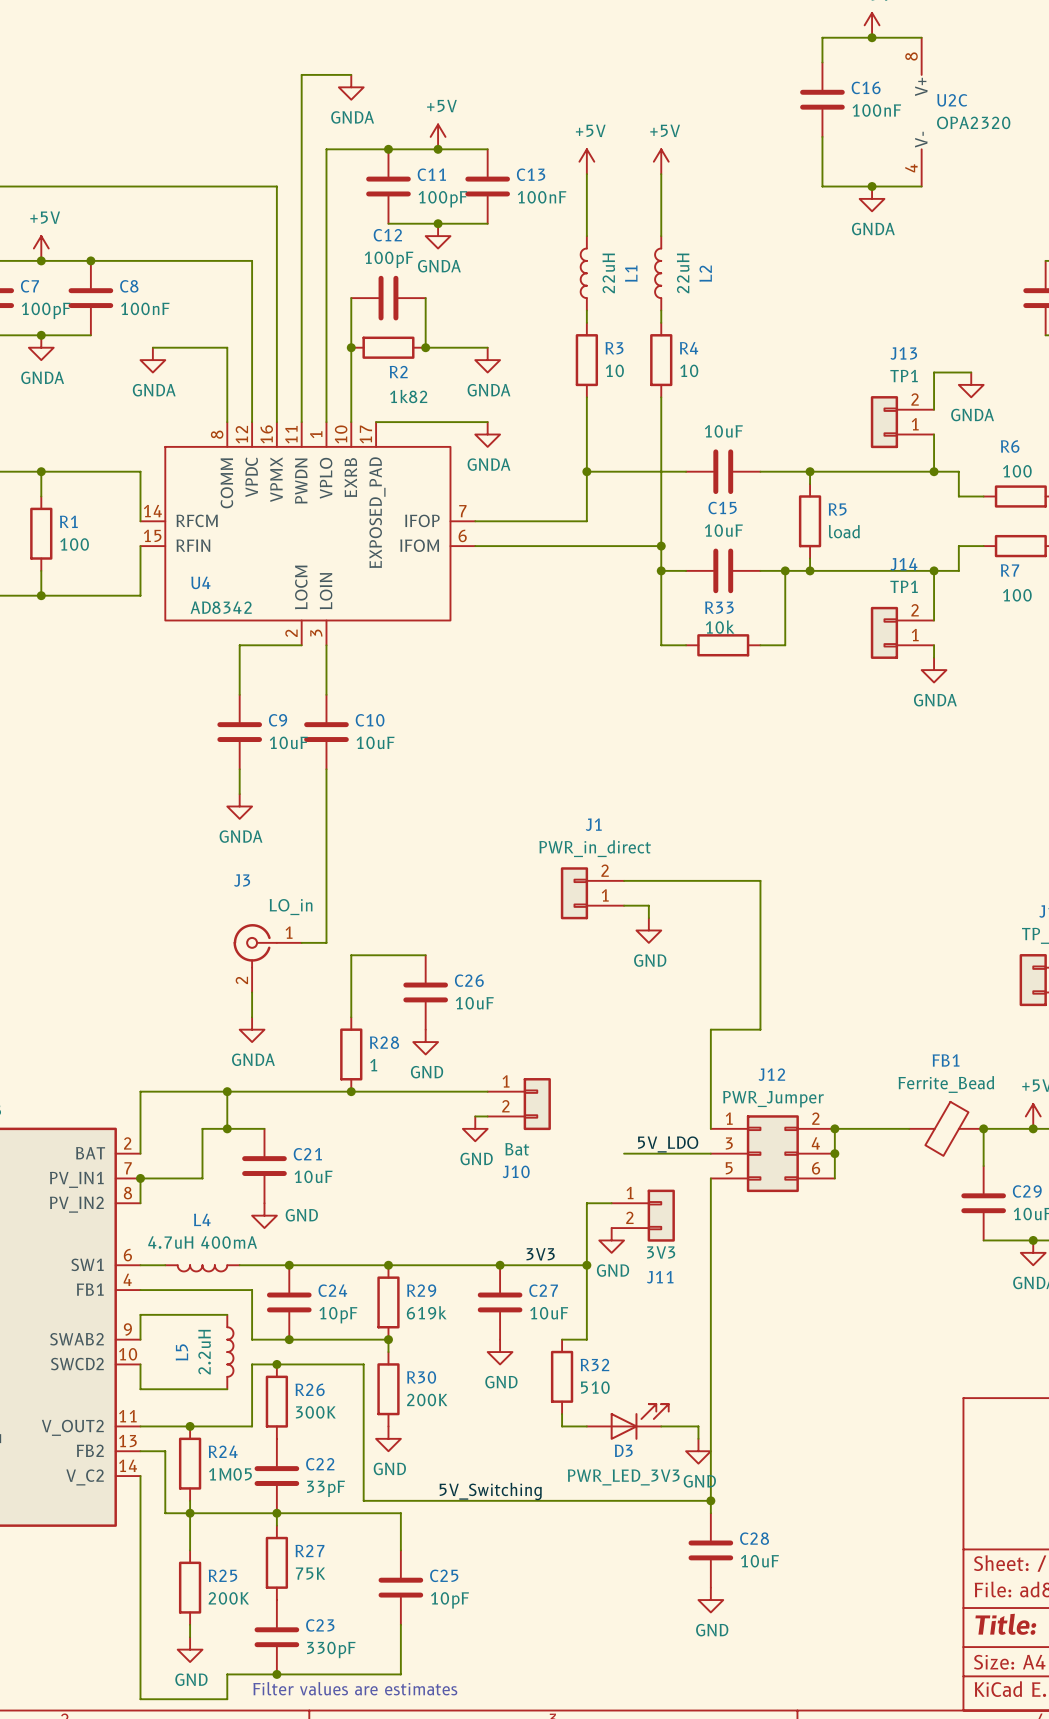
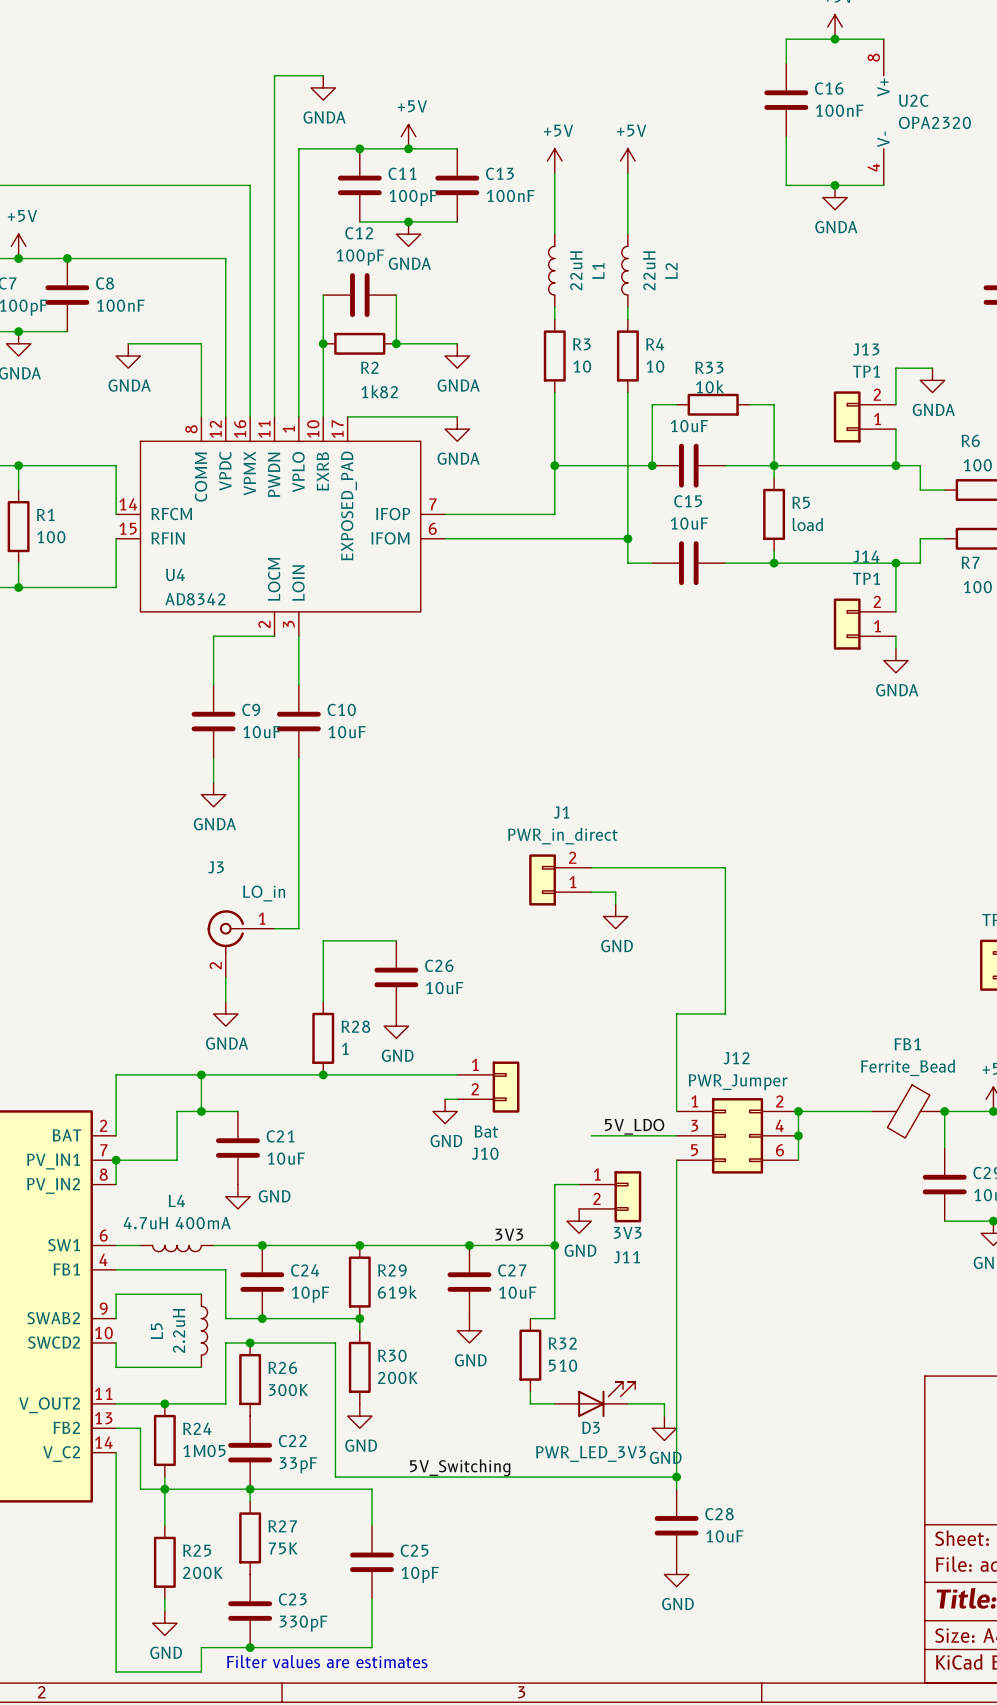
wire: none -> (676, 404) (652, 404) (652, 465)
wire: none -> (749, 404) (774, 404) (774, 465)
junction: none -> (652, 465)
wire: (661, 570) (661, 645) (686, 645) -> none
junction: (661, 570) -> none
wire: (785, 570) (785, 645) (760, 645) -> none
junction: (785, 570) -> none
R33 position: (723, 645) -> (713, 404)

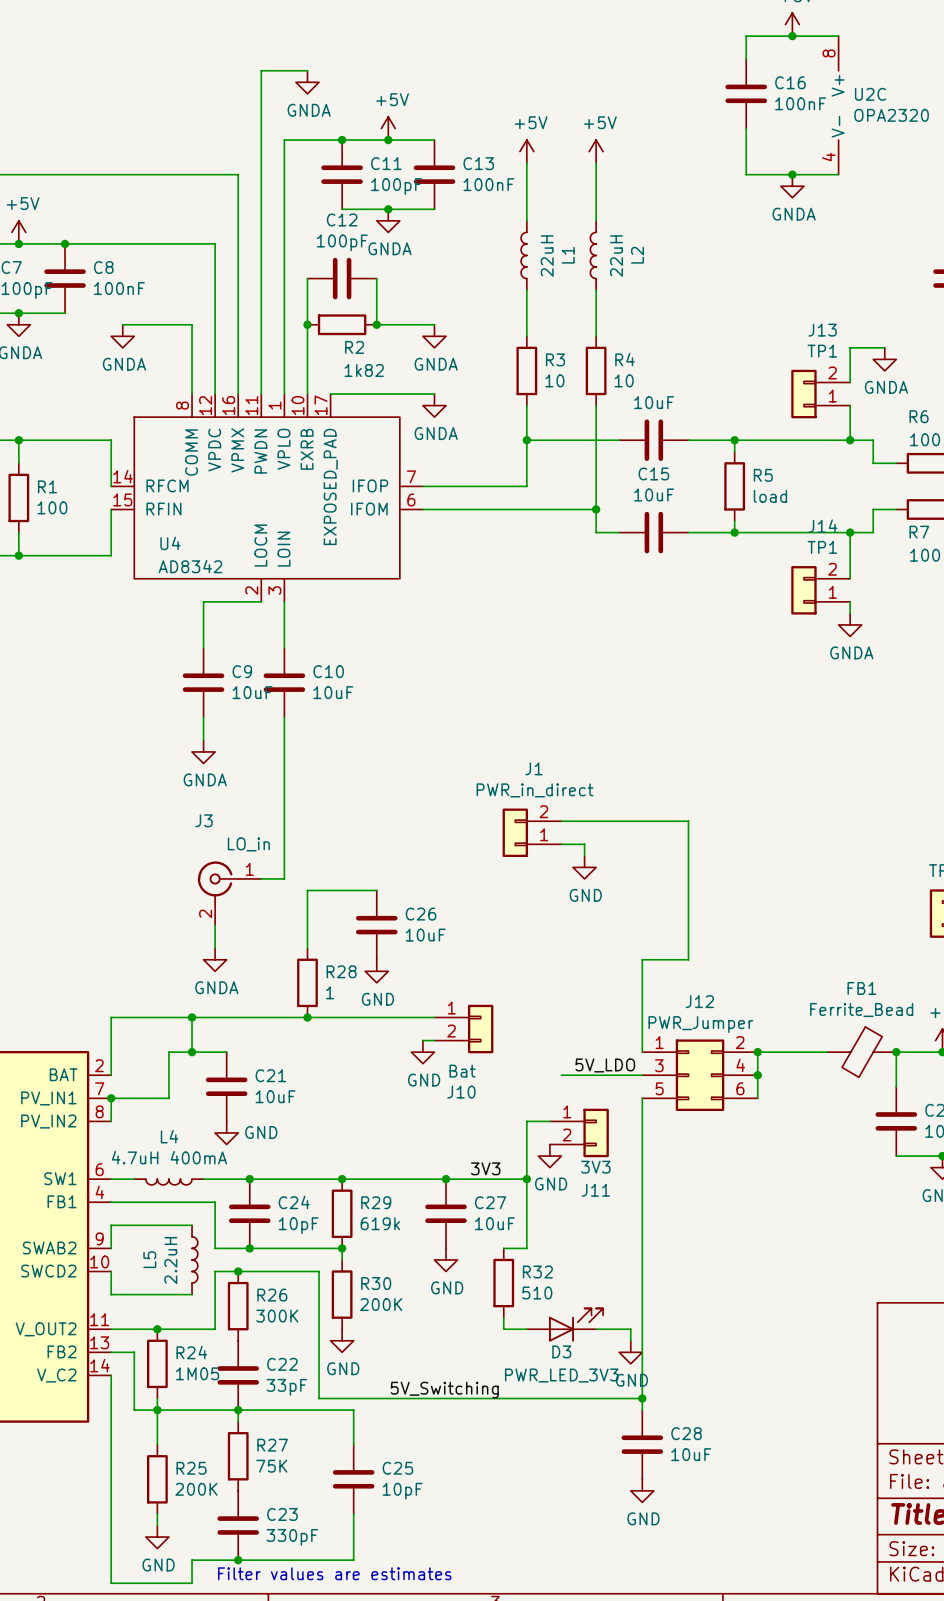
R3 position: (554, 355) -> (526, 370)
R4 position: (627, 355) -> (596, 370)
wire: (554, 392) (554, 429) -> (526, 301) (526, 336)
wire: (627, 392) (627, 429) -> (596, 301) (596, 336)
wire: (676, 404) (652, 404) (652, 465) -> none
R33: 10k (713, 404) -> none
wire: (749, 404) (774, 404) (774, 465) -> none
junction: (652, 465) -> none

